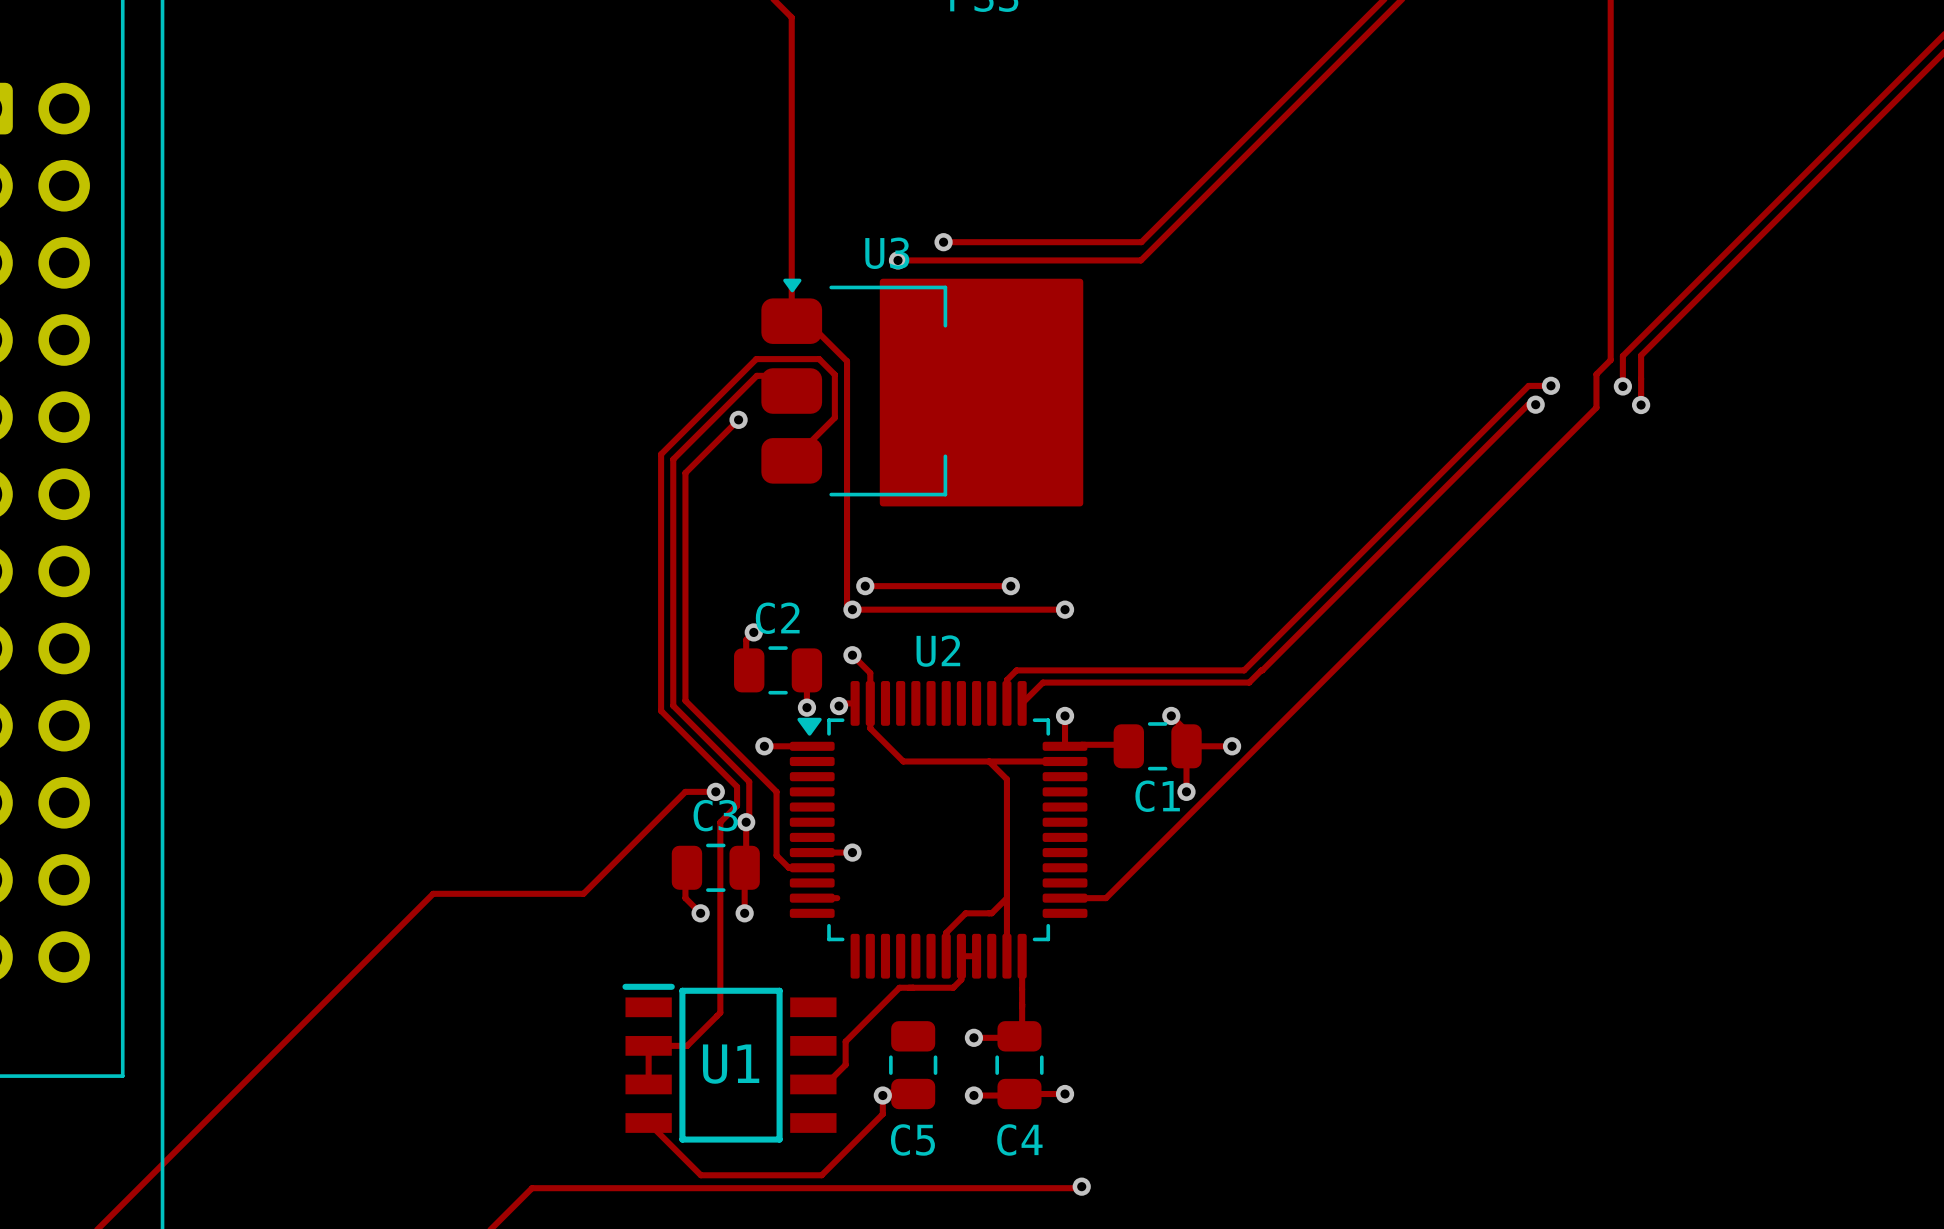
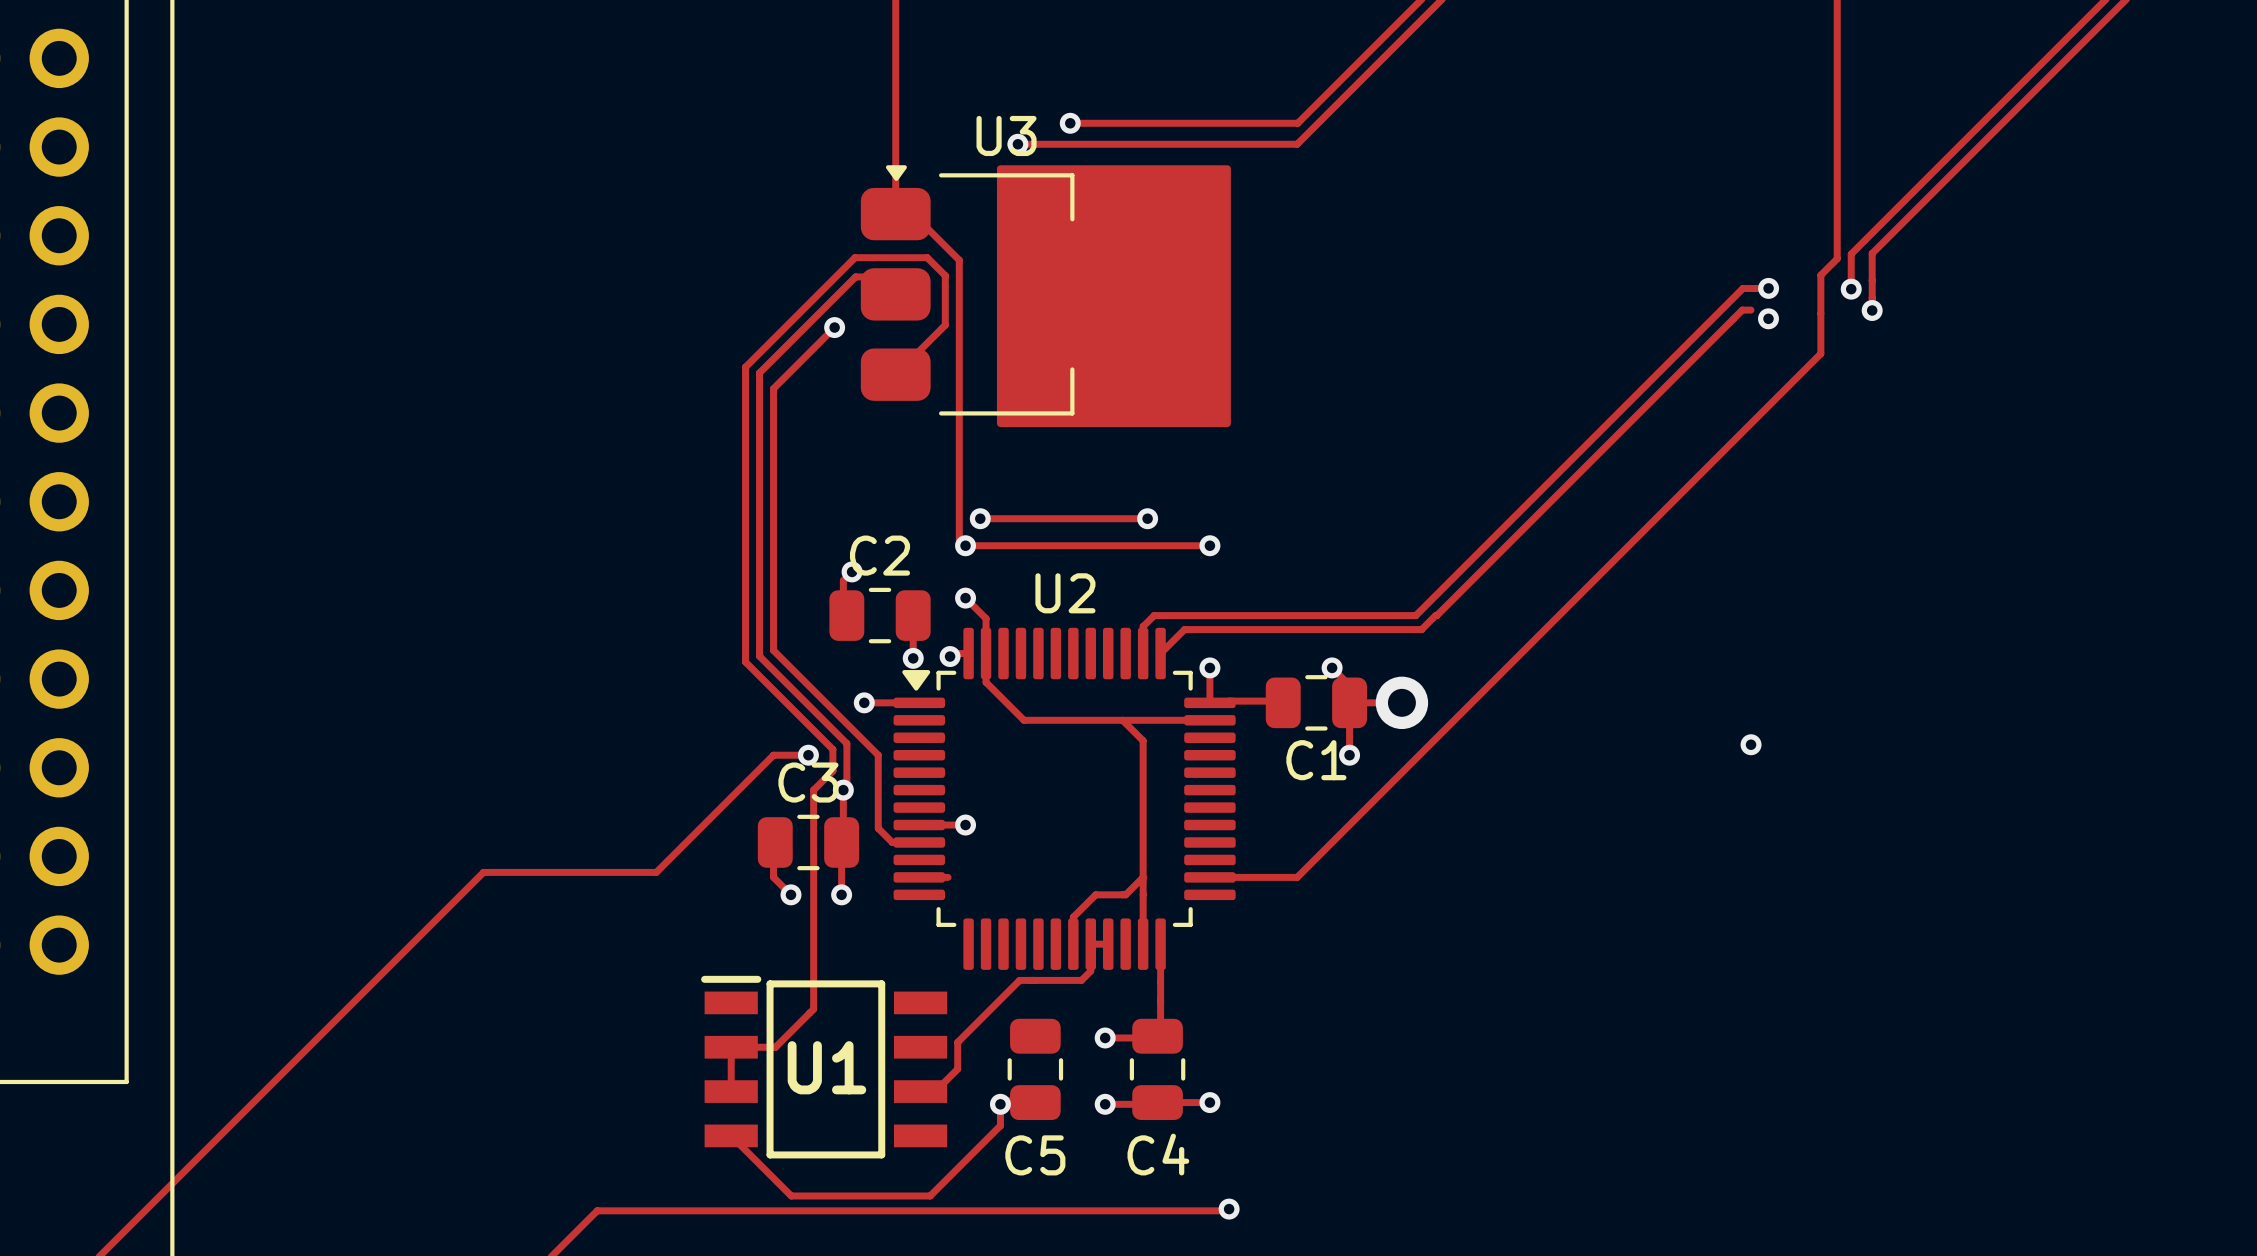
via position: (1535, 404) -> (1768, 318)
track: (1596, 407) (1106, 898) -> (1820, 313) (1820, 353) (1297, 877) (1257, 877)
via size: [1222, 737, 1242, 756] -> [1375, 676, 1429, 730]
via: none -> (1751, 744)

